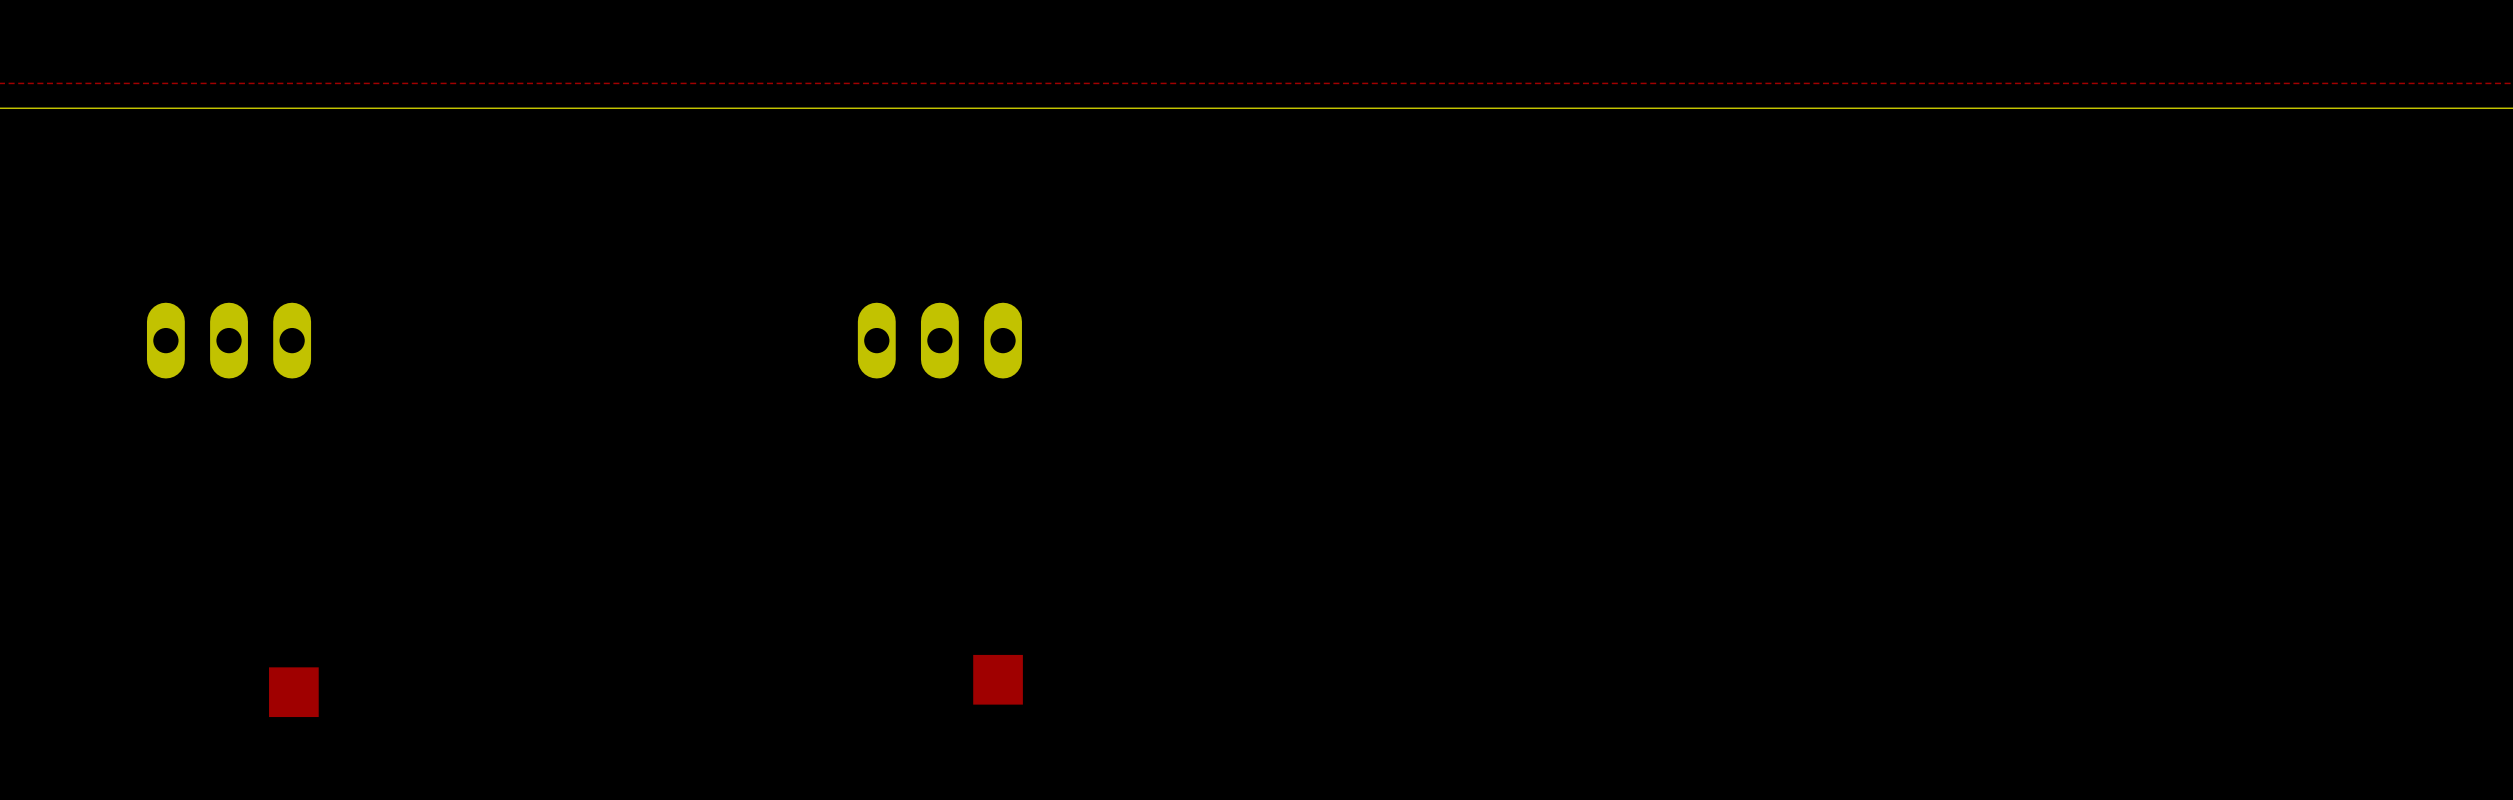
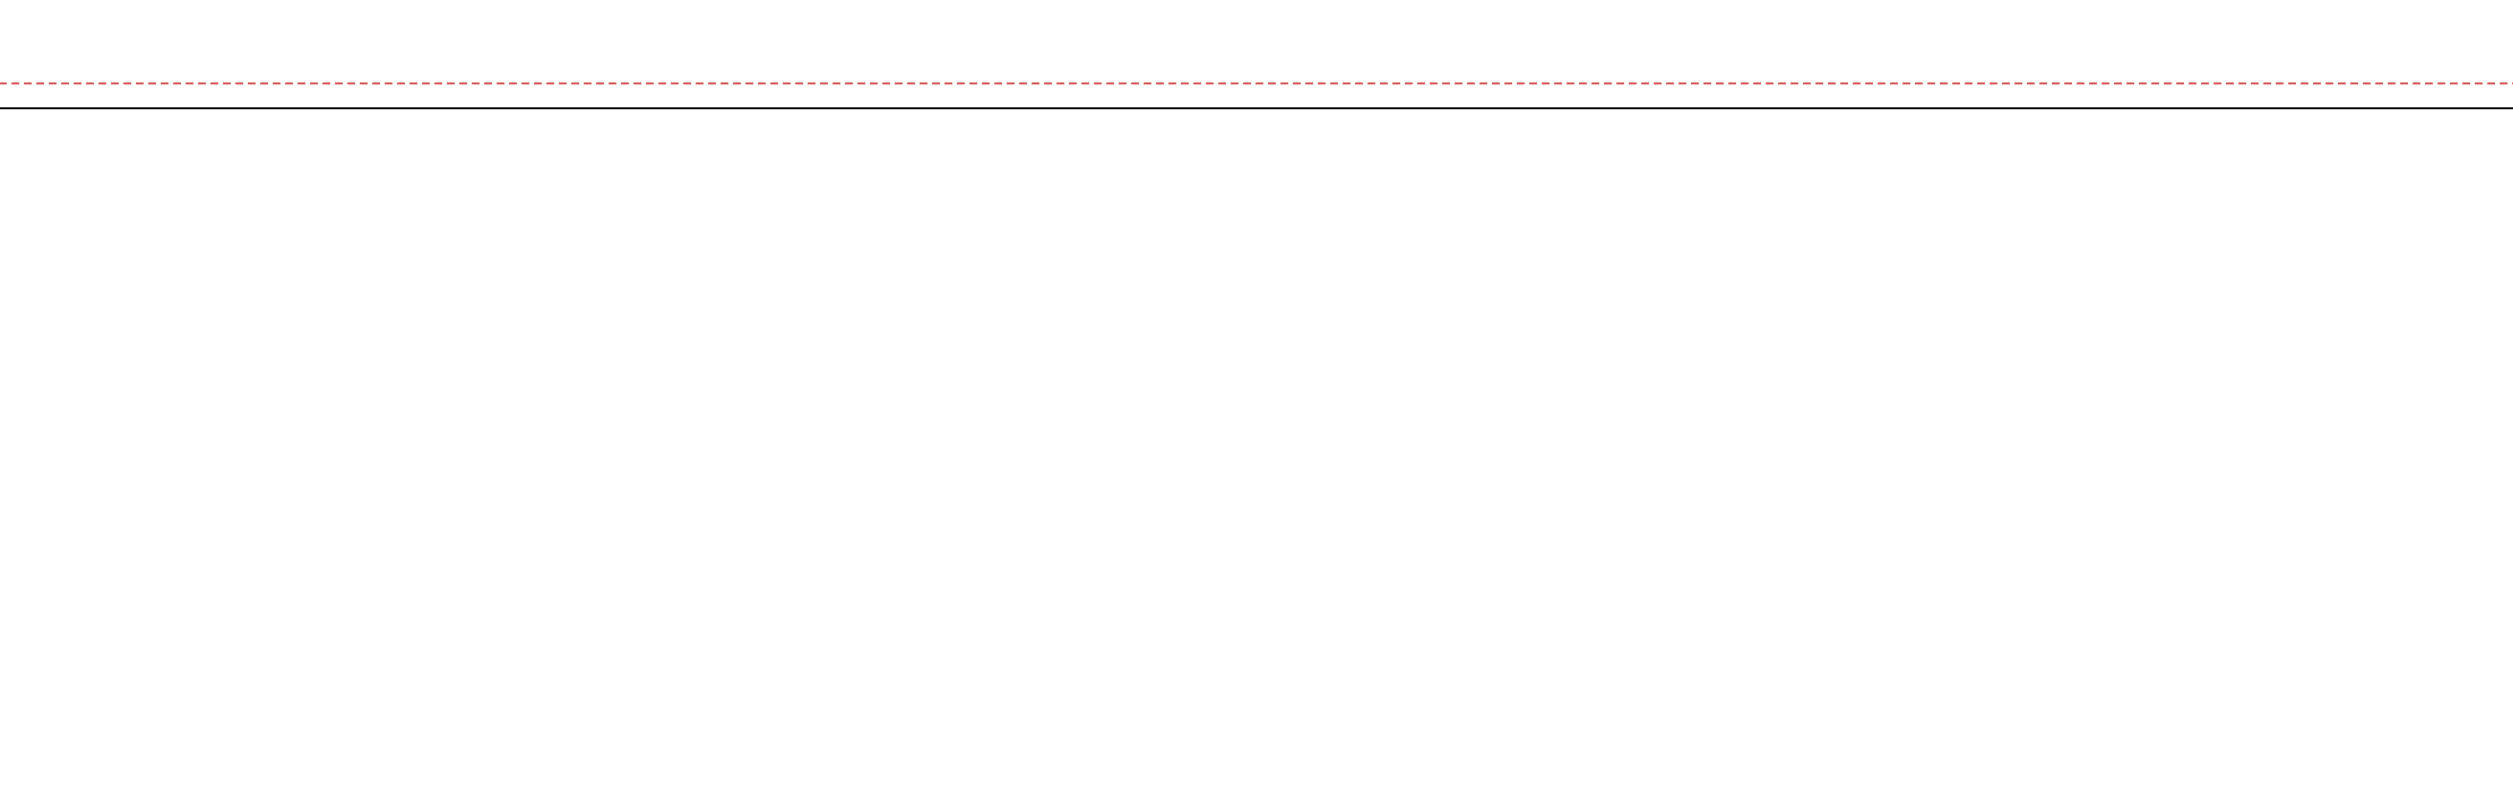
part: (229, 340) -> none
part: (939, 340) -> none
part: (998, 679) -> none
part: (293, 692) -> none

